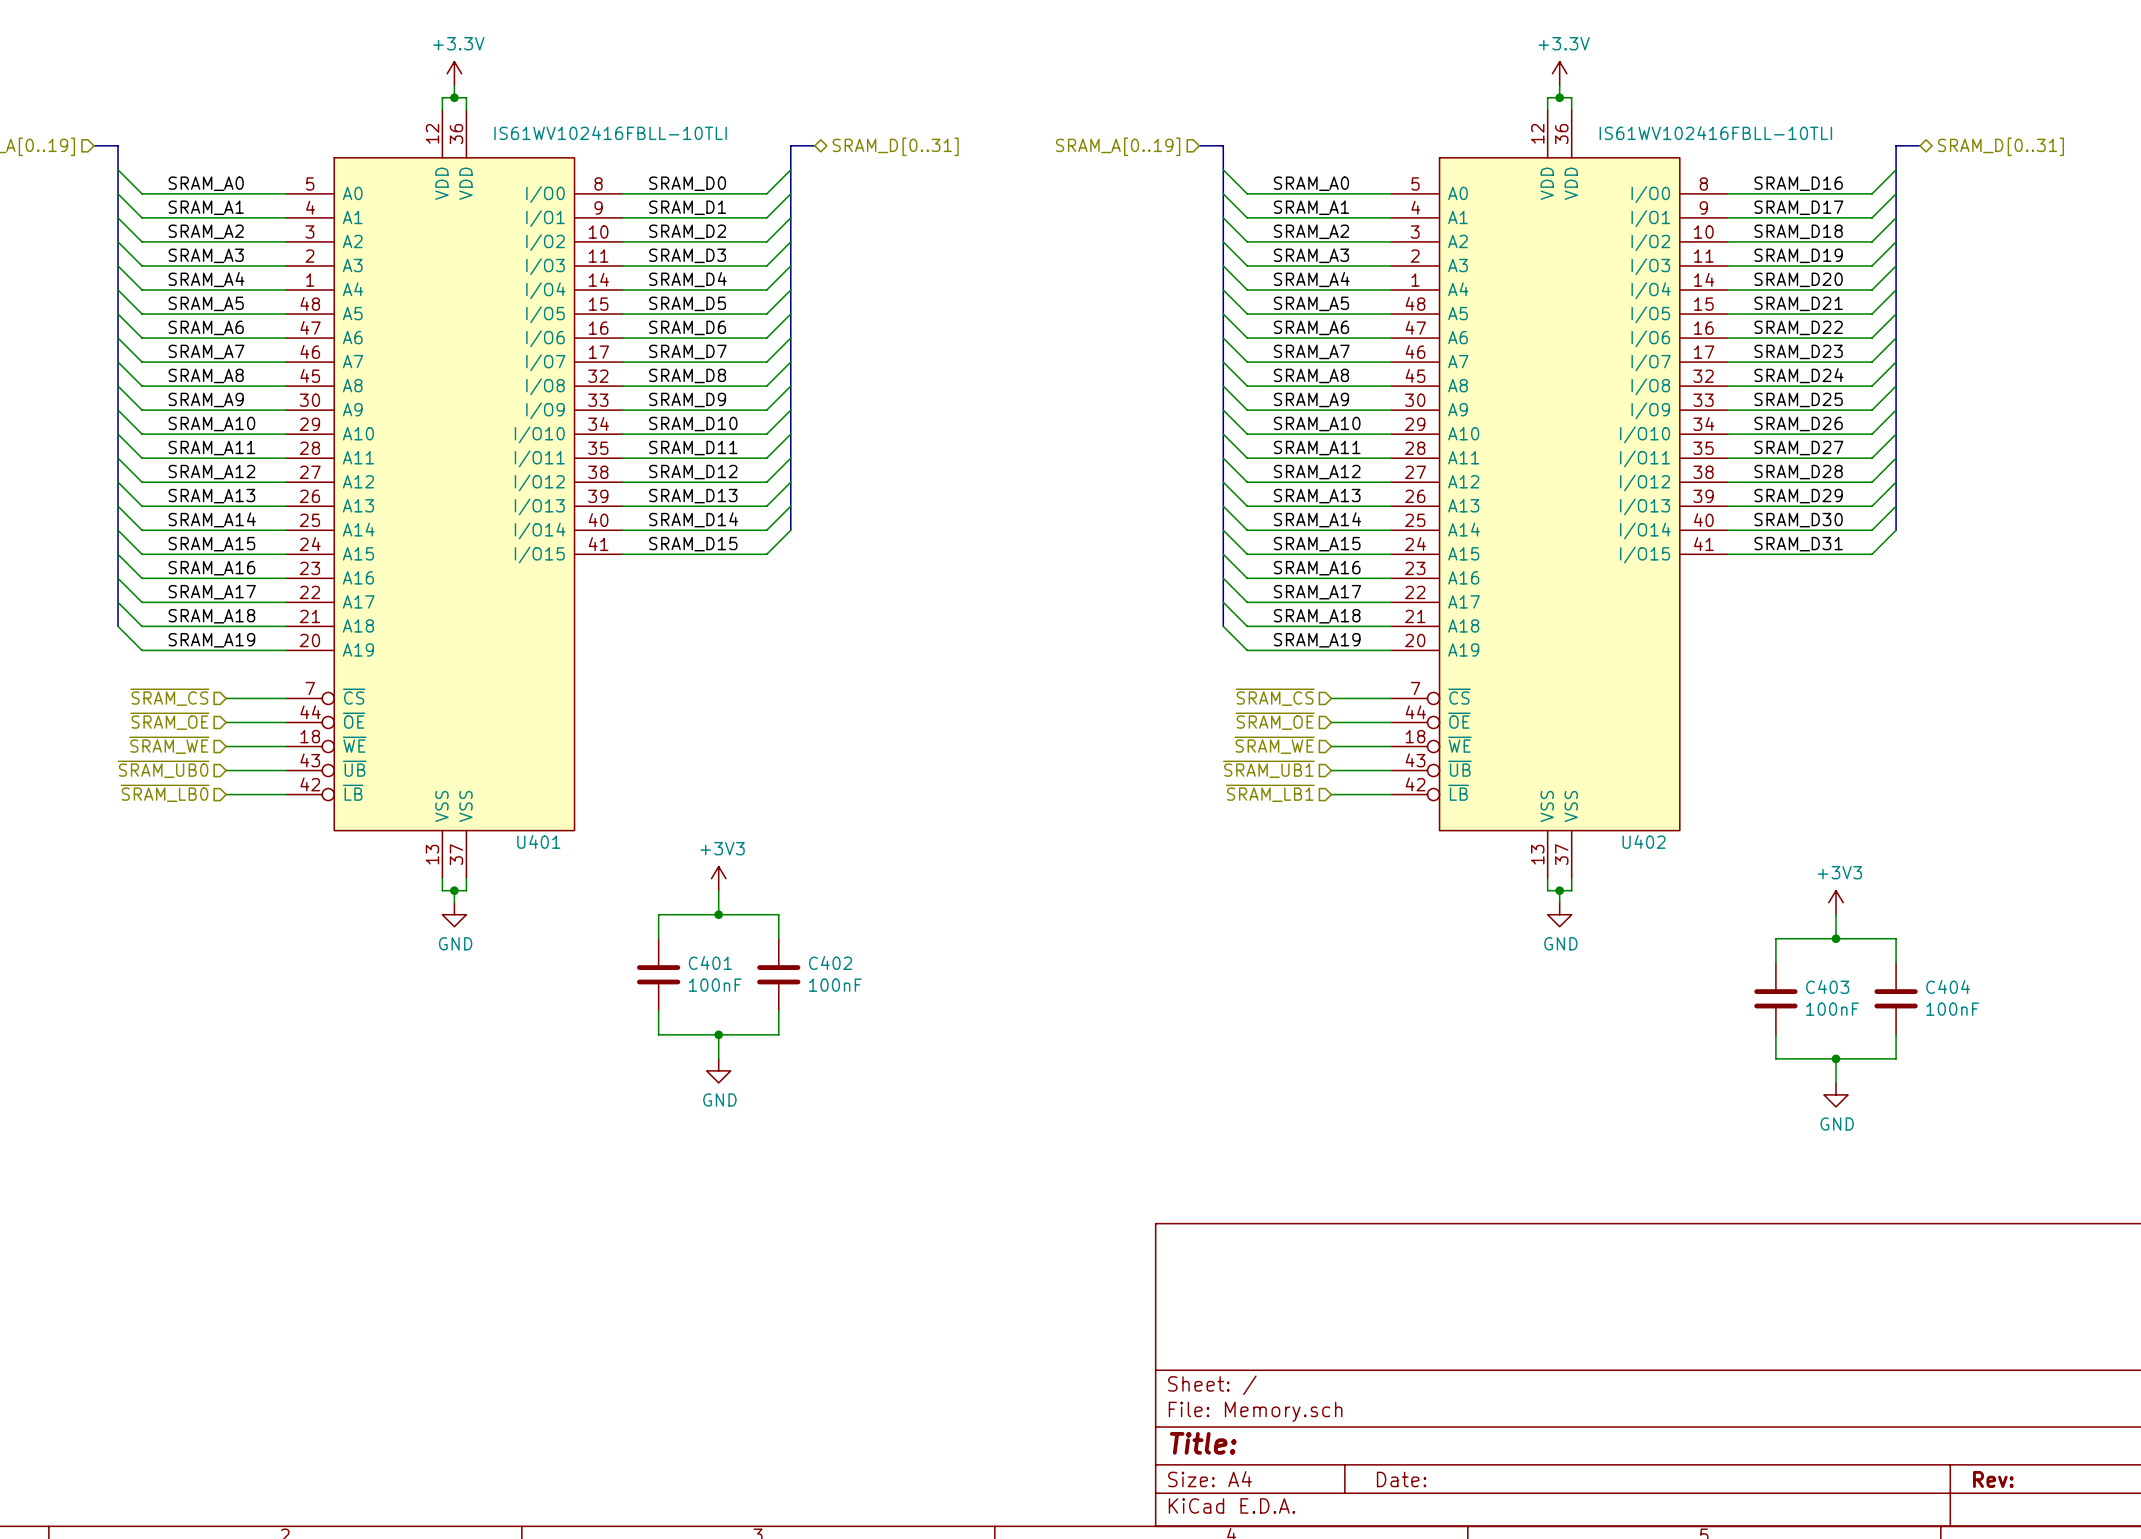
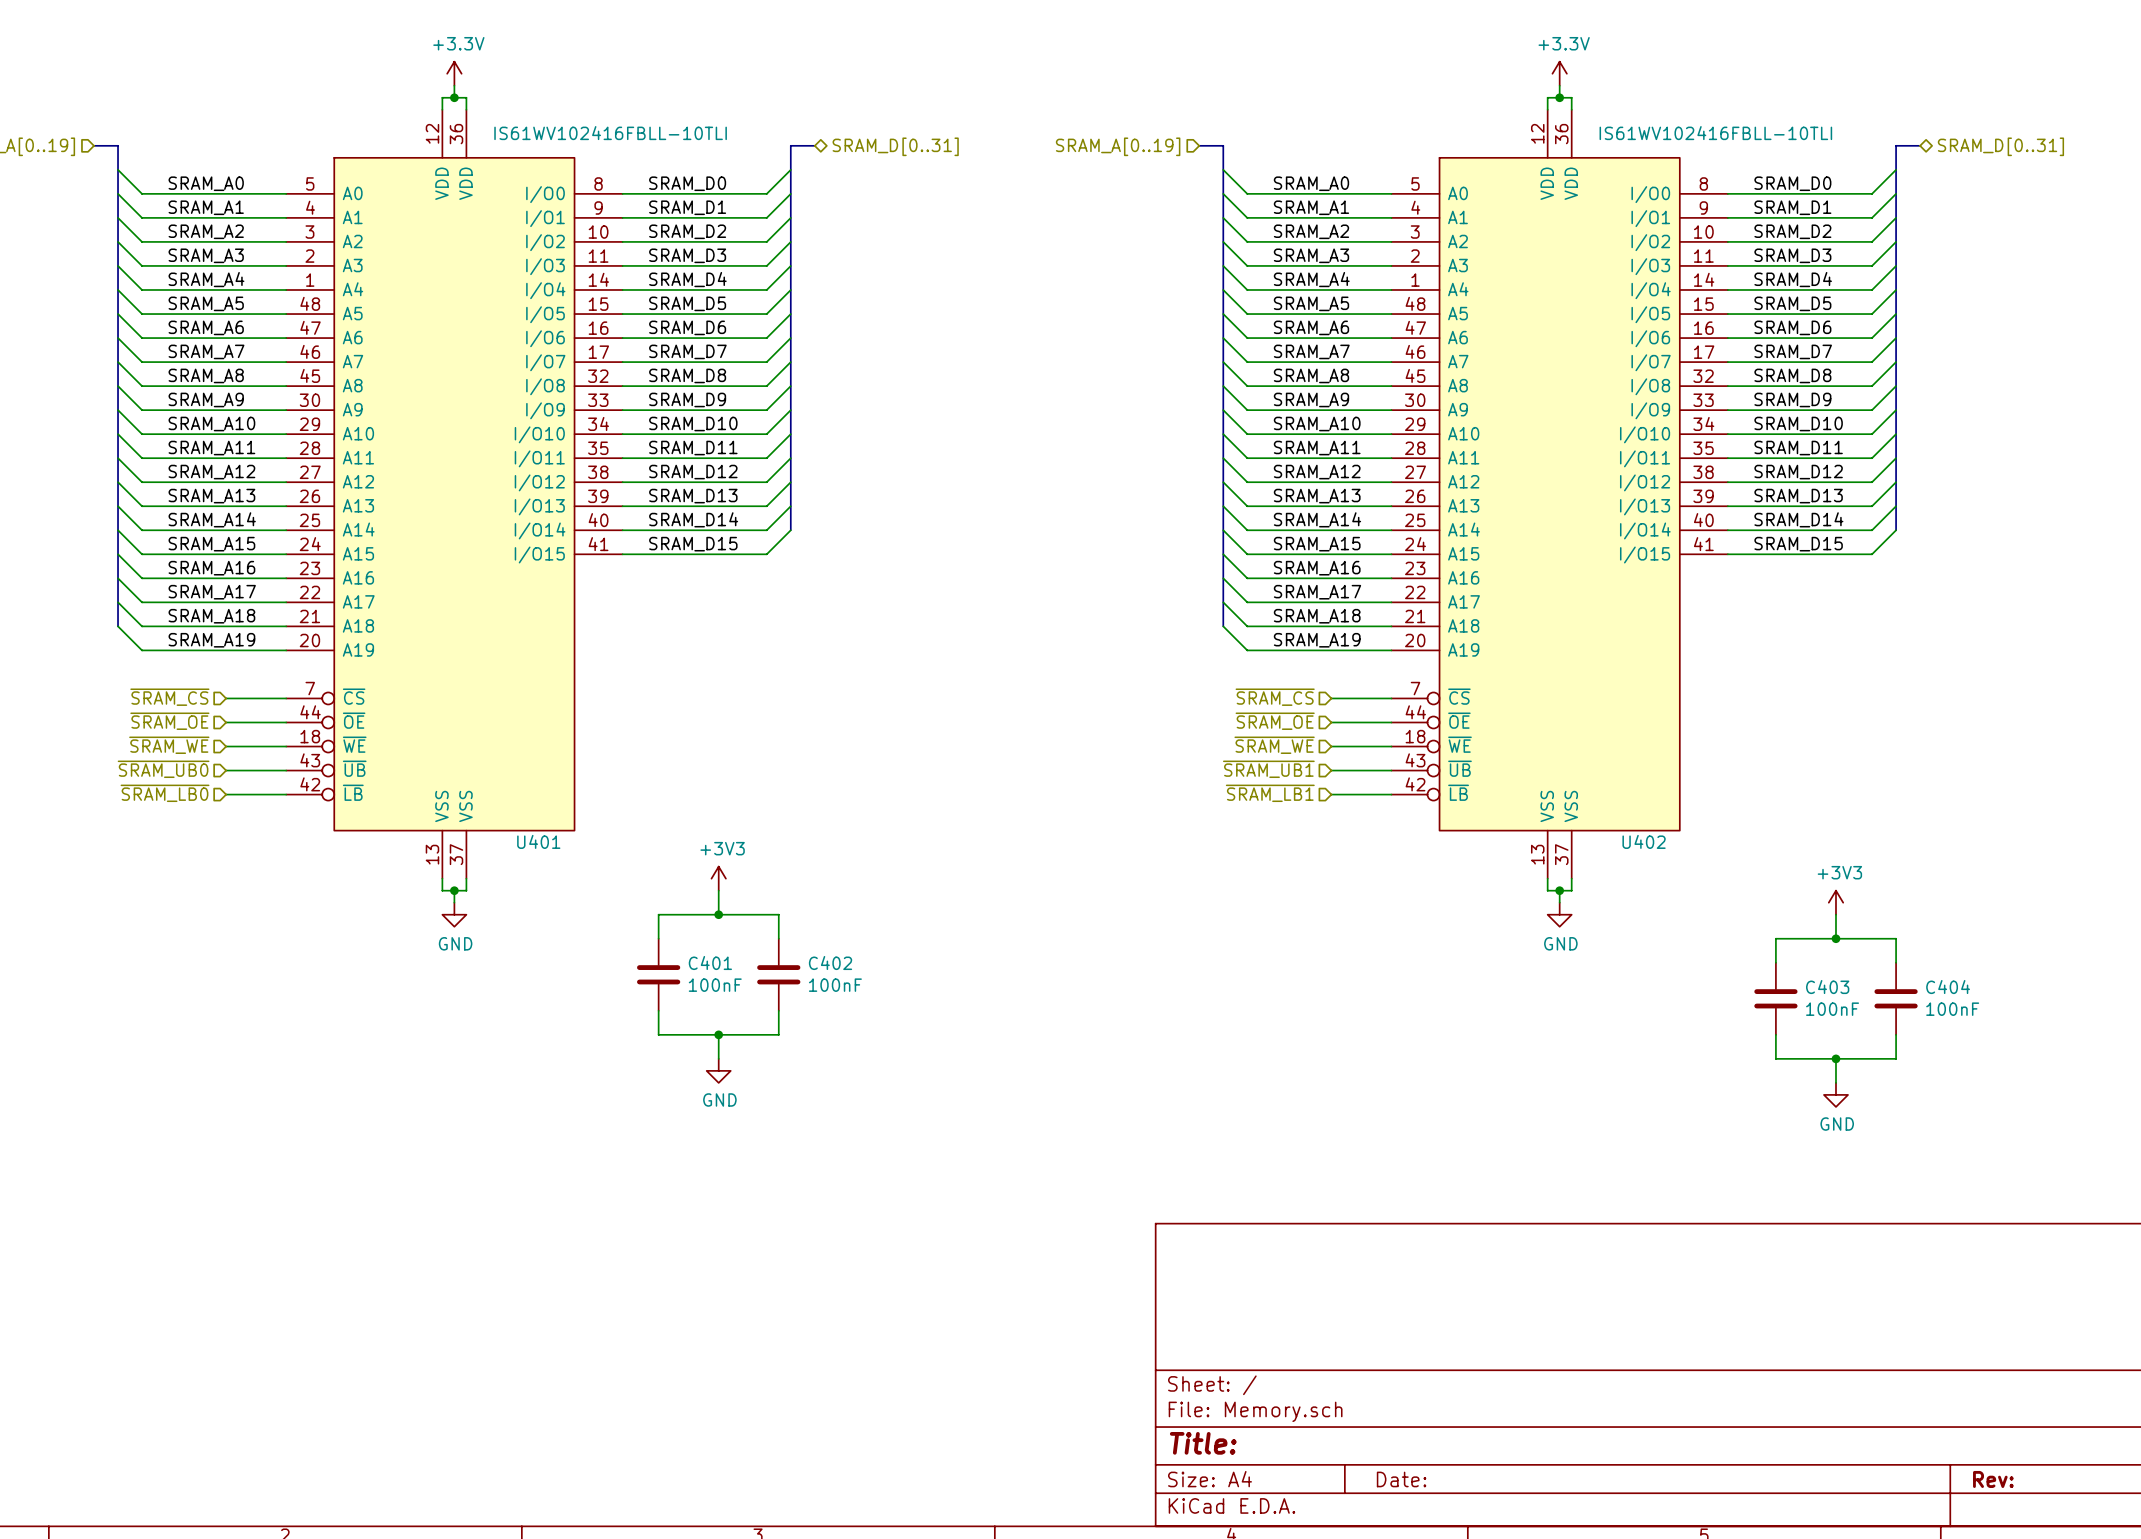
label: SRAM_D16 (1798, 183) -> SRAM_D0 (1792, 183)
label: SRAM_D17 (1798, 207) -> SRAM_D1 (1792, 207)
label: SRAM_D18 (1798, 231) -> SRAM_D2 (1792, 231)
label: SRAM_D19 (1798, 255) -> SRAM_D3 (1792, 255)
label: SRAM_D20 (1798, 279) -> SRAM_D4 (1793, 279)
label: SRAM_D21 (1798, 303) -> SRAM_D5 (1792, 303)
label: SRAM_D22 (1798, 327) -> SRAM_D6 (1792, 327)
label: SRAM_D23 (1798, 351) -> SRAM_D7 (1793, 351)
label: SRAM_D24 (1798, 375) -> SRAM_D8 (1792, 375)
label: SRAM_D25 (1798, 399) -> SRAM_D9 (1792, 399)
label: SRAM_D26 (1798, 424) -> SRAM_D10 (1798, 424)
label: SRAM_D27 (1798, 448) -> SRAM_D11 (1798, 448)
label: SRAM_D28 (1798, 472) -> SRAM_D12 (1798, 472)
label: SRAM_D29 (1798, 496) -> SRAM_D13 (1798, 496)
label: SRAM_D30 (1798, 520) -> SRAM_D14 (1798, 519)
label: SRAM_D31 (1798, 544) -> SRAM_D15 (1798, 544)

